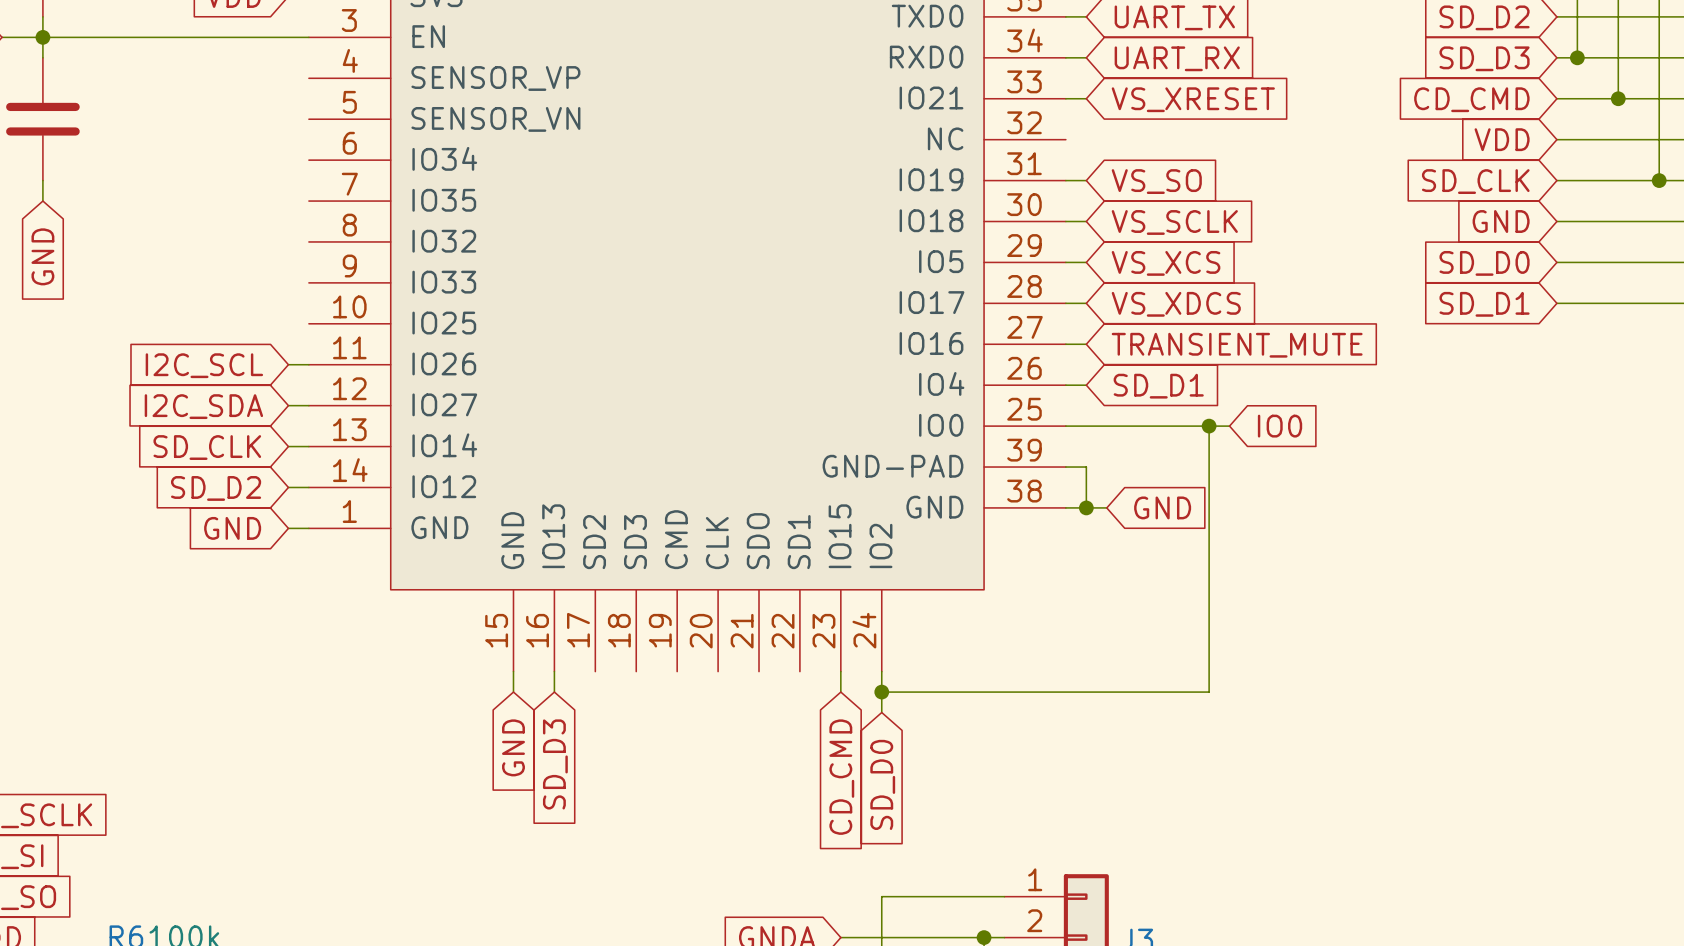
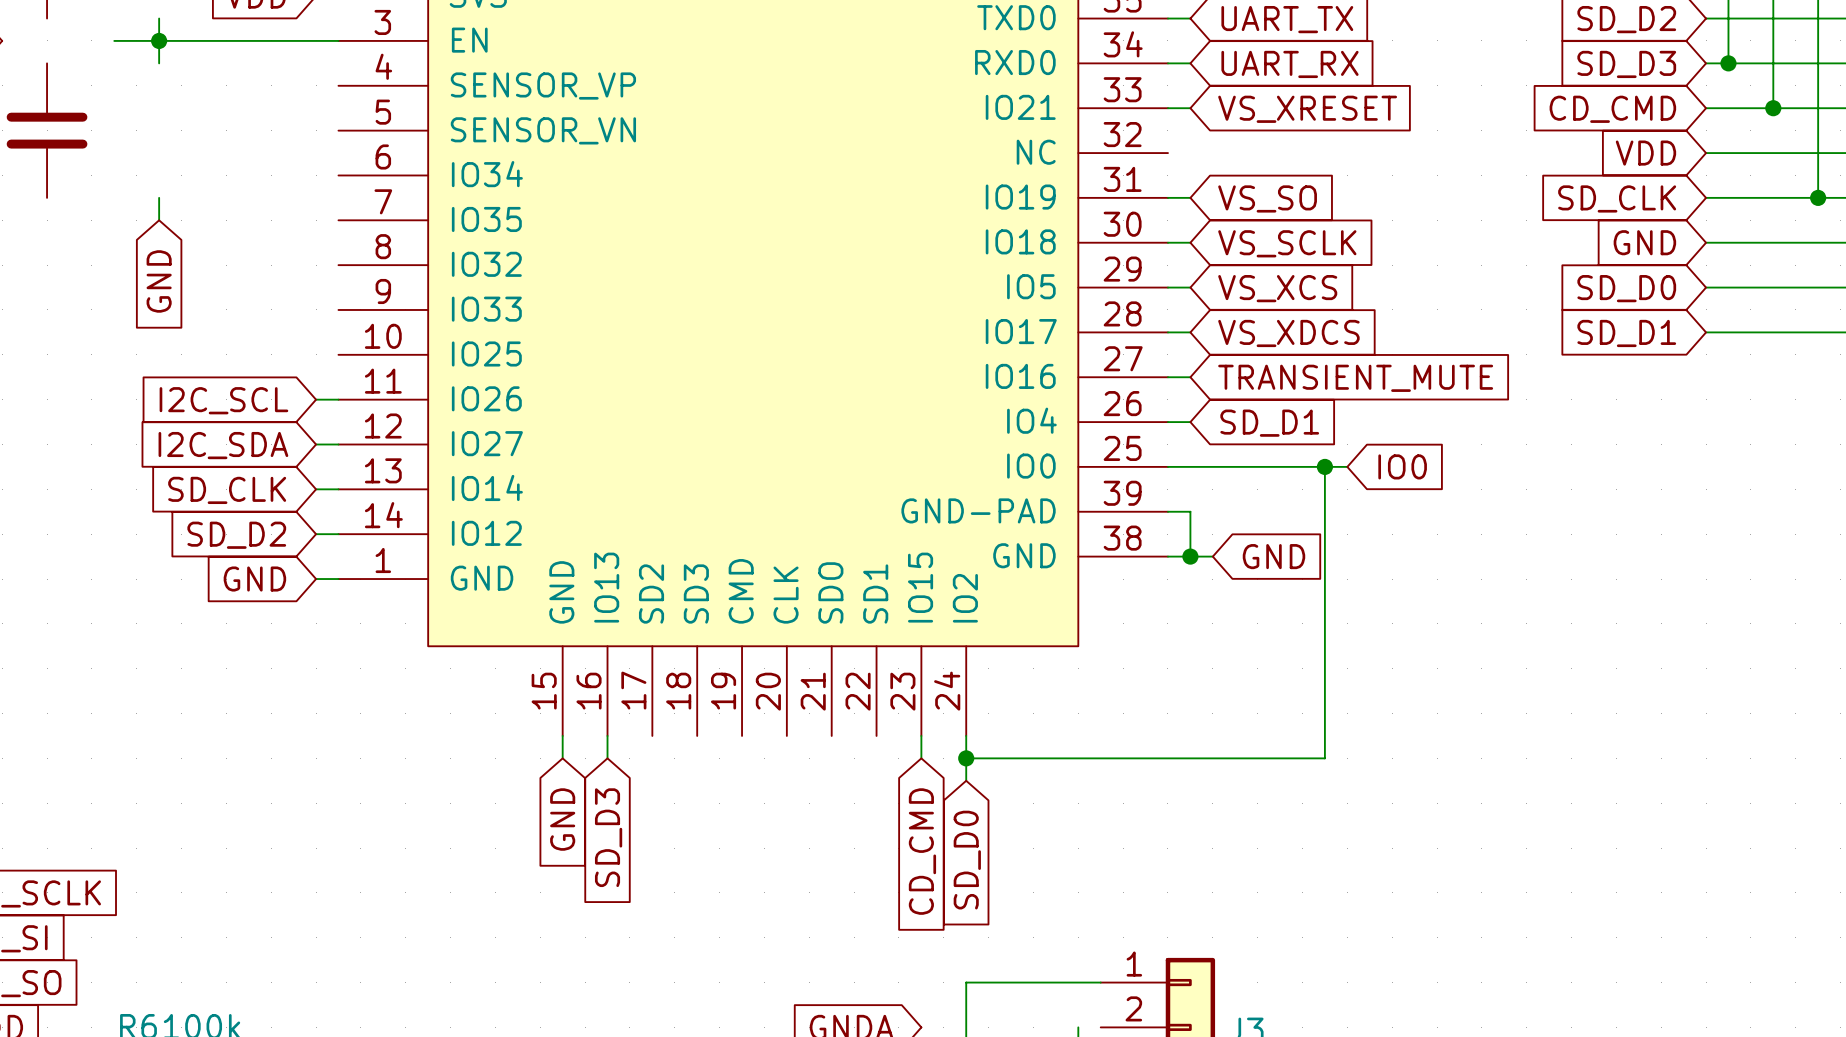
wire: (42, 16) (42, 57) -> (159, 18) (159, 63)
wire: (2, 37) (104, 37) -> none
junction: (42, 37) -> none
junction: none -> (159, 40)
wire: (42, 180) (42, 201) -> (159, 197) (159, 220)
global label position: GND (42, 256) -> GND (159, 281)
wire: (840, 937) (1004, 937) -> none
junction: (984, 937) -> none

